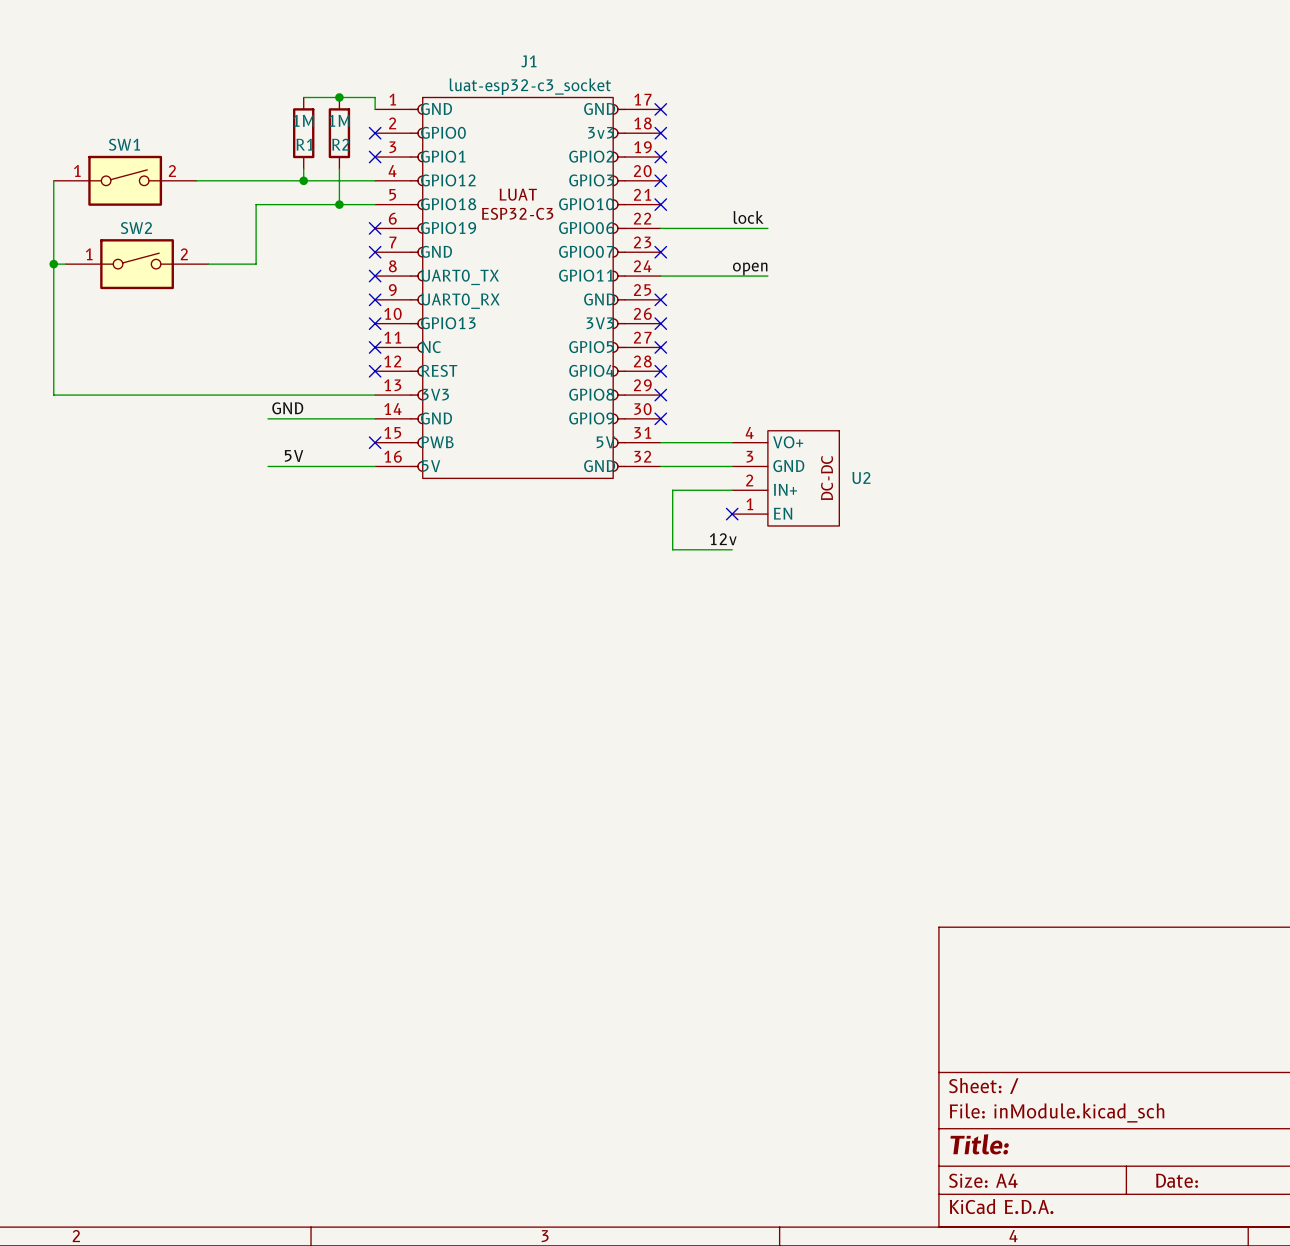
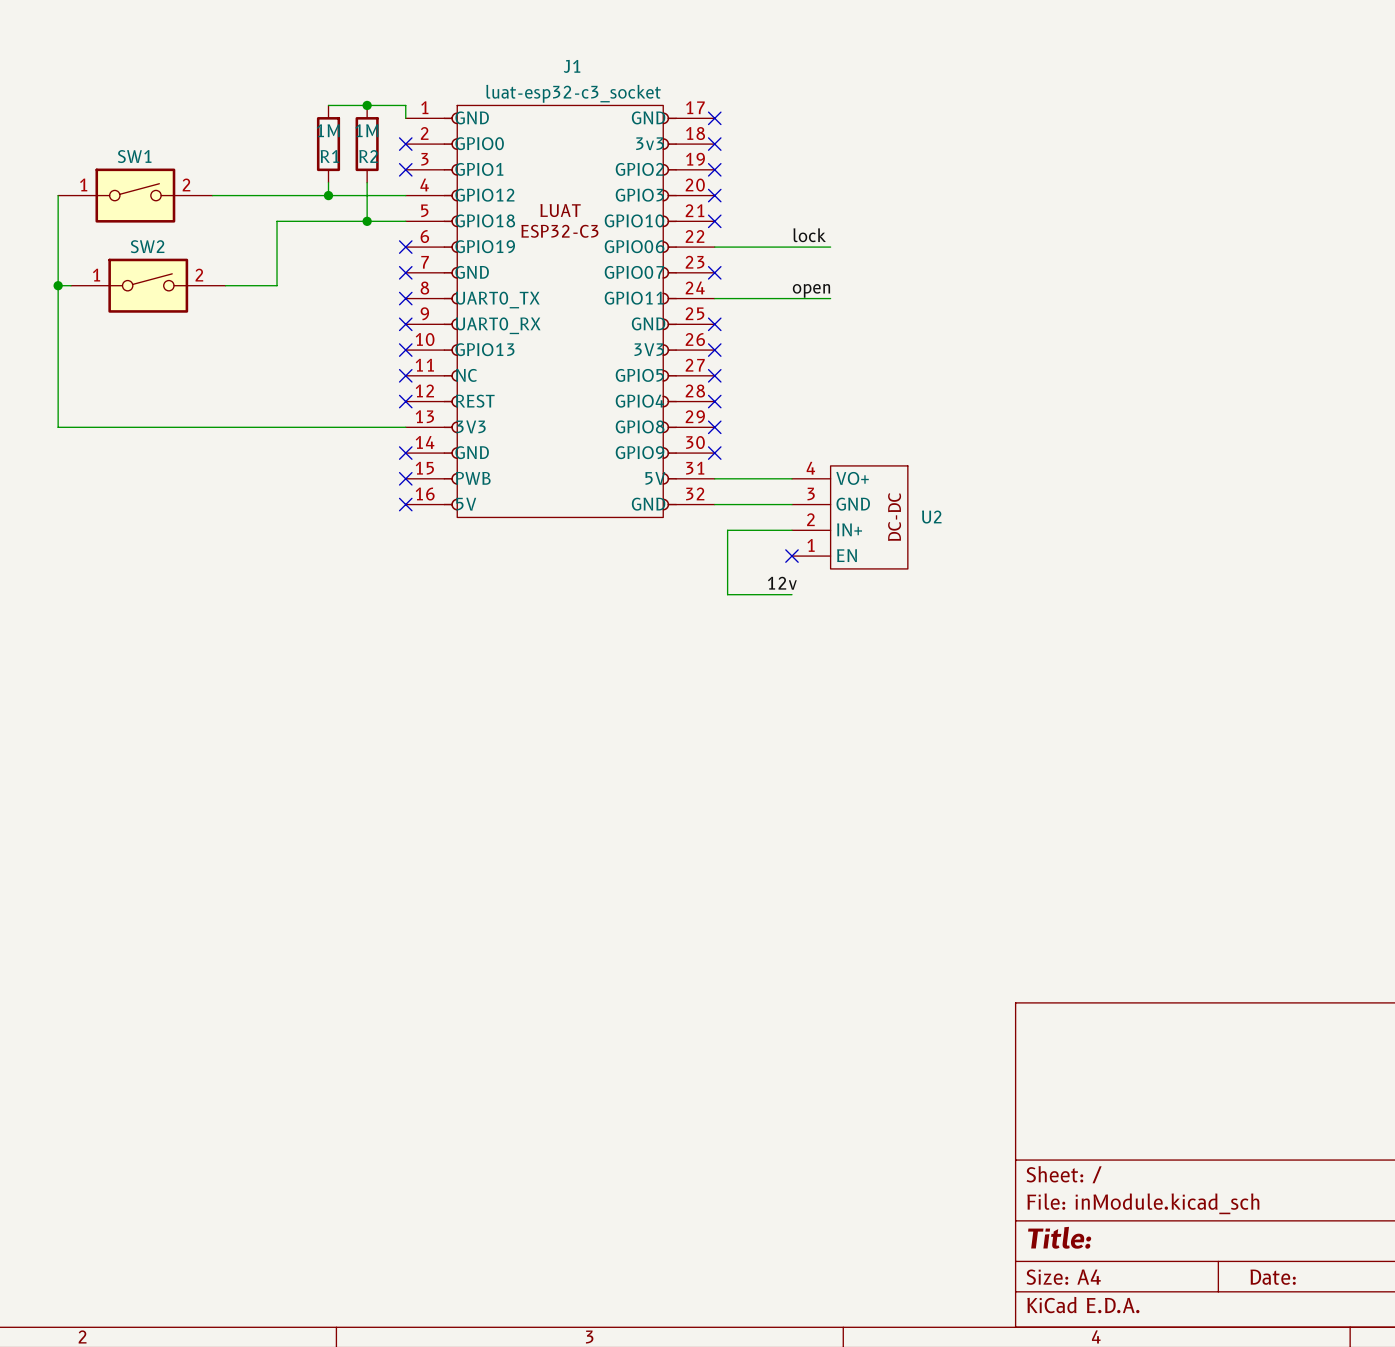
label: GND (287, 408) -> none
wire: (268, 418) (375, 418) -> none
no-connect mark: none -> (405, 453)
label: 5V (294, 455) -> none
wire: (268, 466) (375, 466) -> none
no-connect mark: none -> (405, 504)

